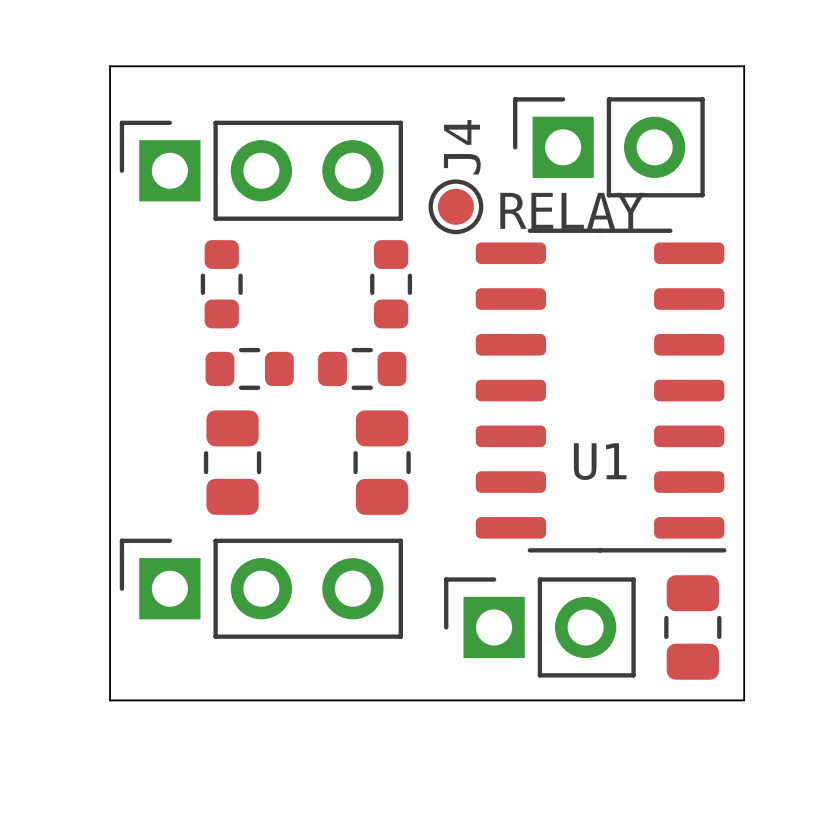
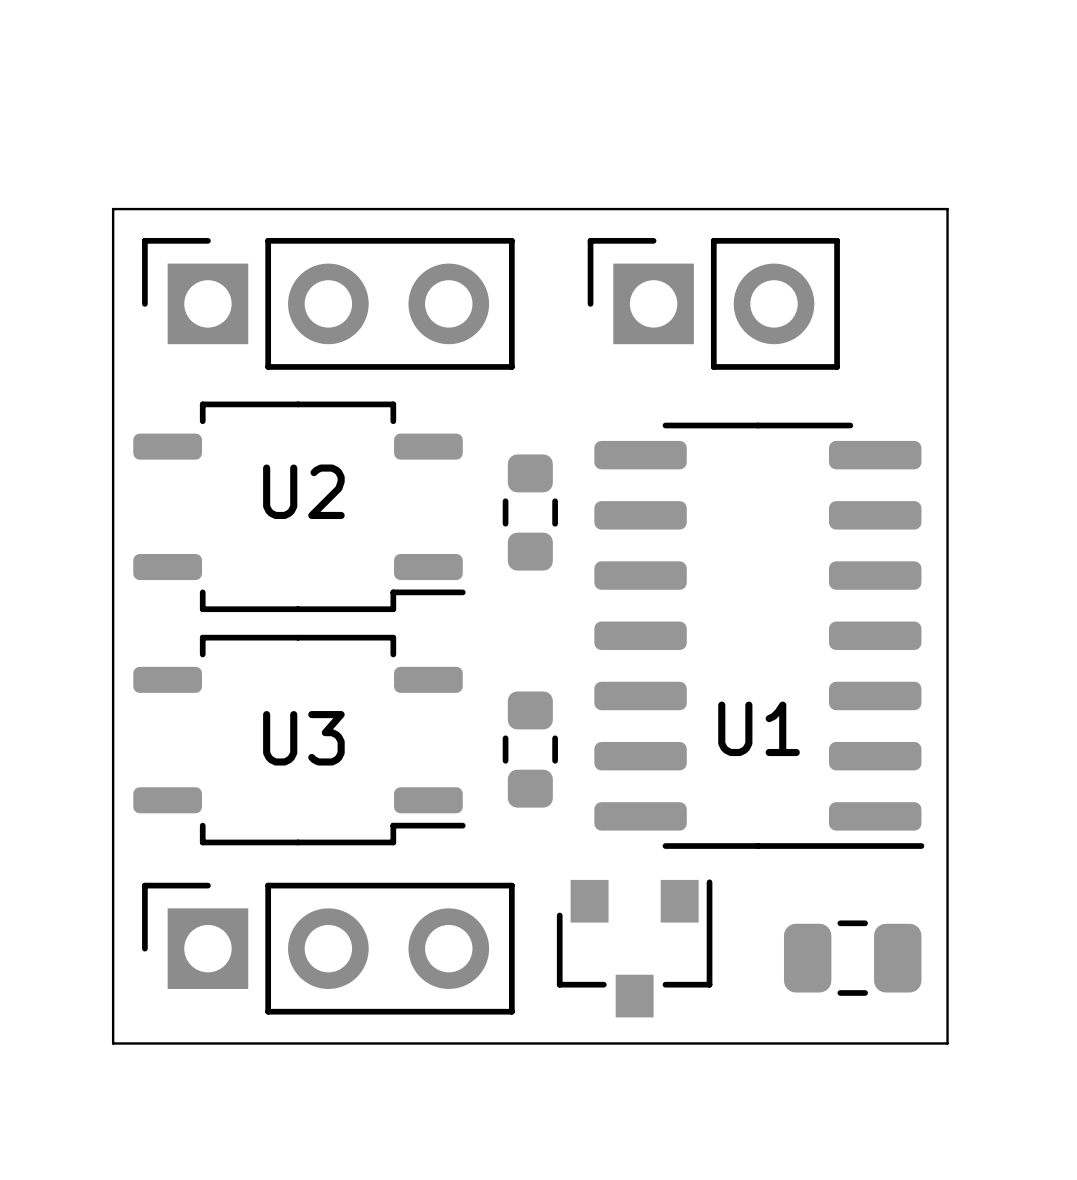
part: none -> (713, 303)
J4: (608, 147) -> none
part position: (261, 170) -> (328, 303)
part: RELAY (455, 206) -> none
part: (221, 284) -> none
part position: (391, 284) -> (530, 512)
U2: none -> (299, 506)
part: (249, 368) -> none
part: (362, 368) -> none
part: (232, 462) -> none
part: (382, 462) -> none
U3: none -> (299, 740)
part: none -> (530, 749)
part footprint: [444, 577, 636, 678] -> [556, 879, 713, 1018]
part position: (261, 588) -> (328, 948)
part rotation: 0° (692, 627) -> 90° clockwise (852, 958)

